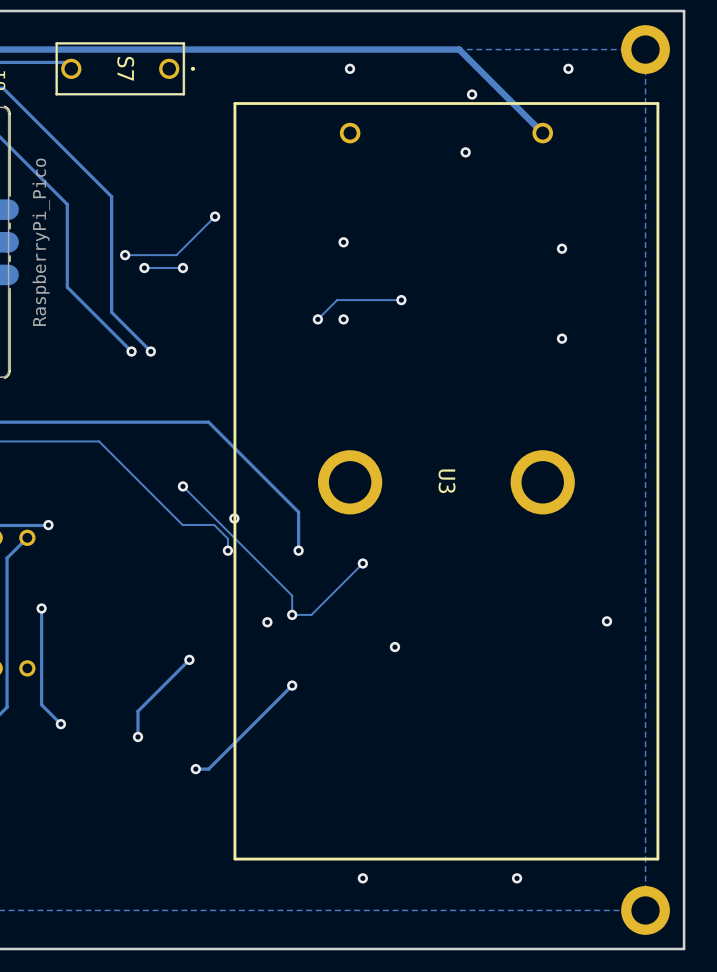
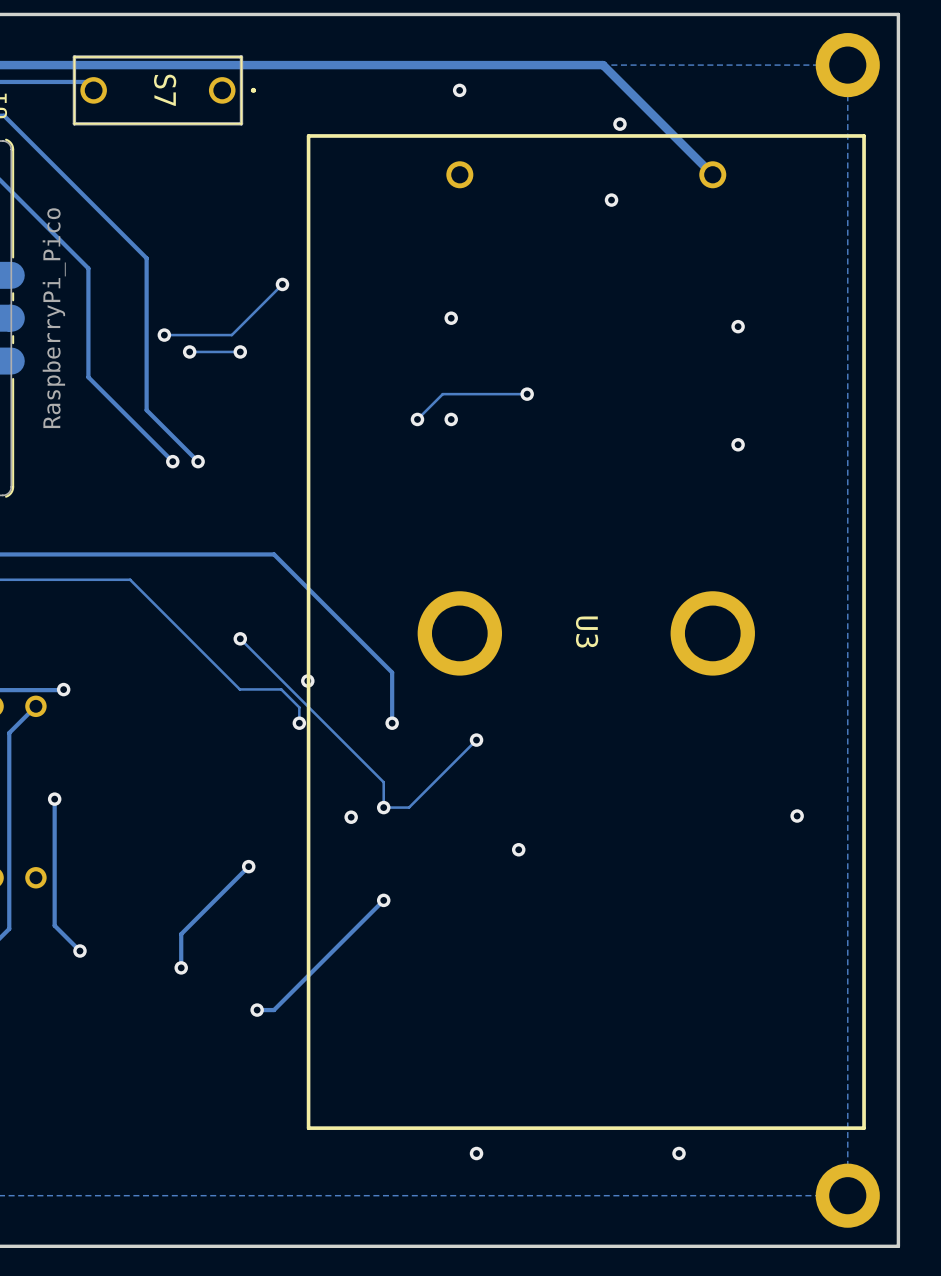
via: (568, 68) -> none

